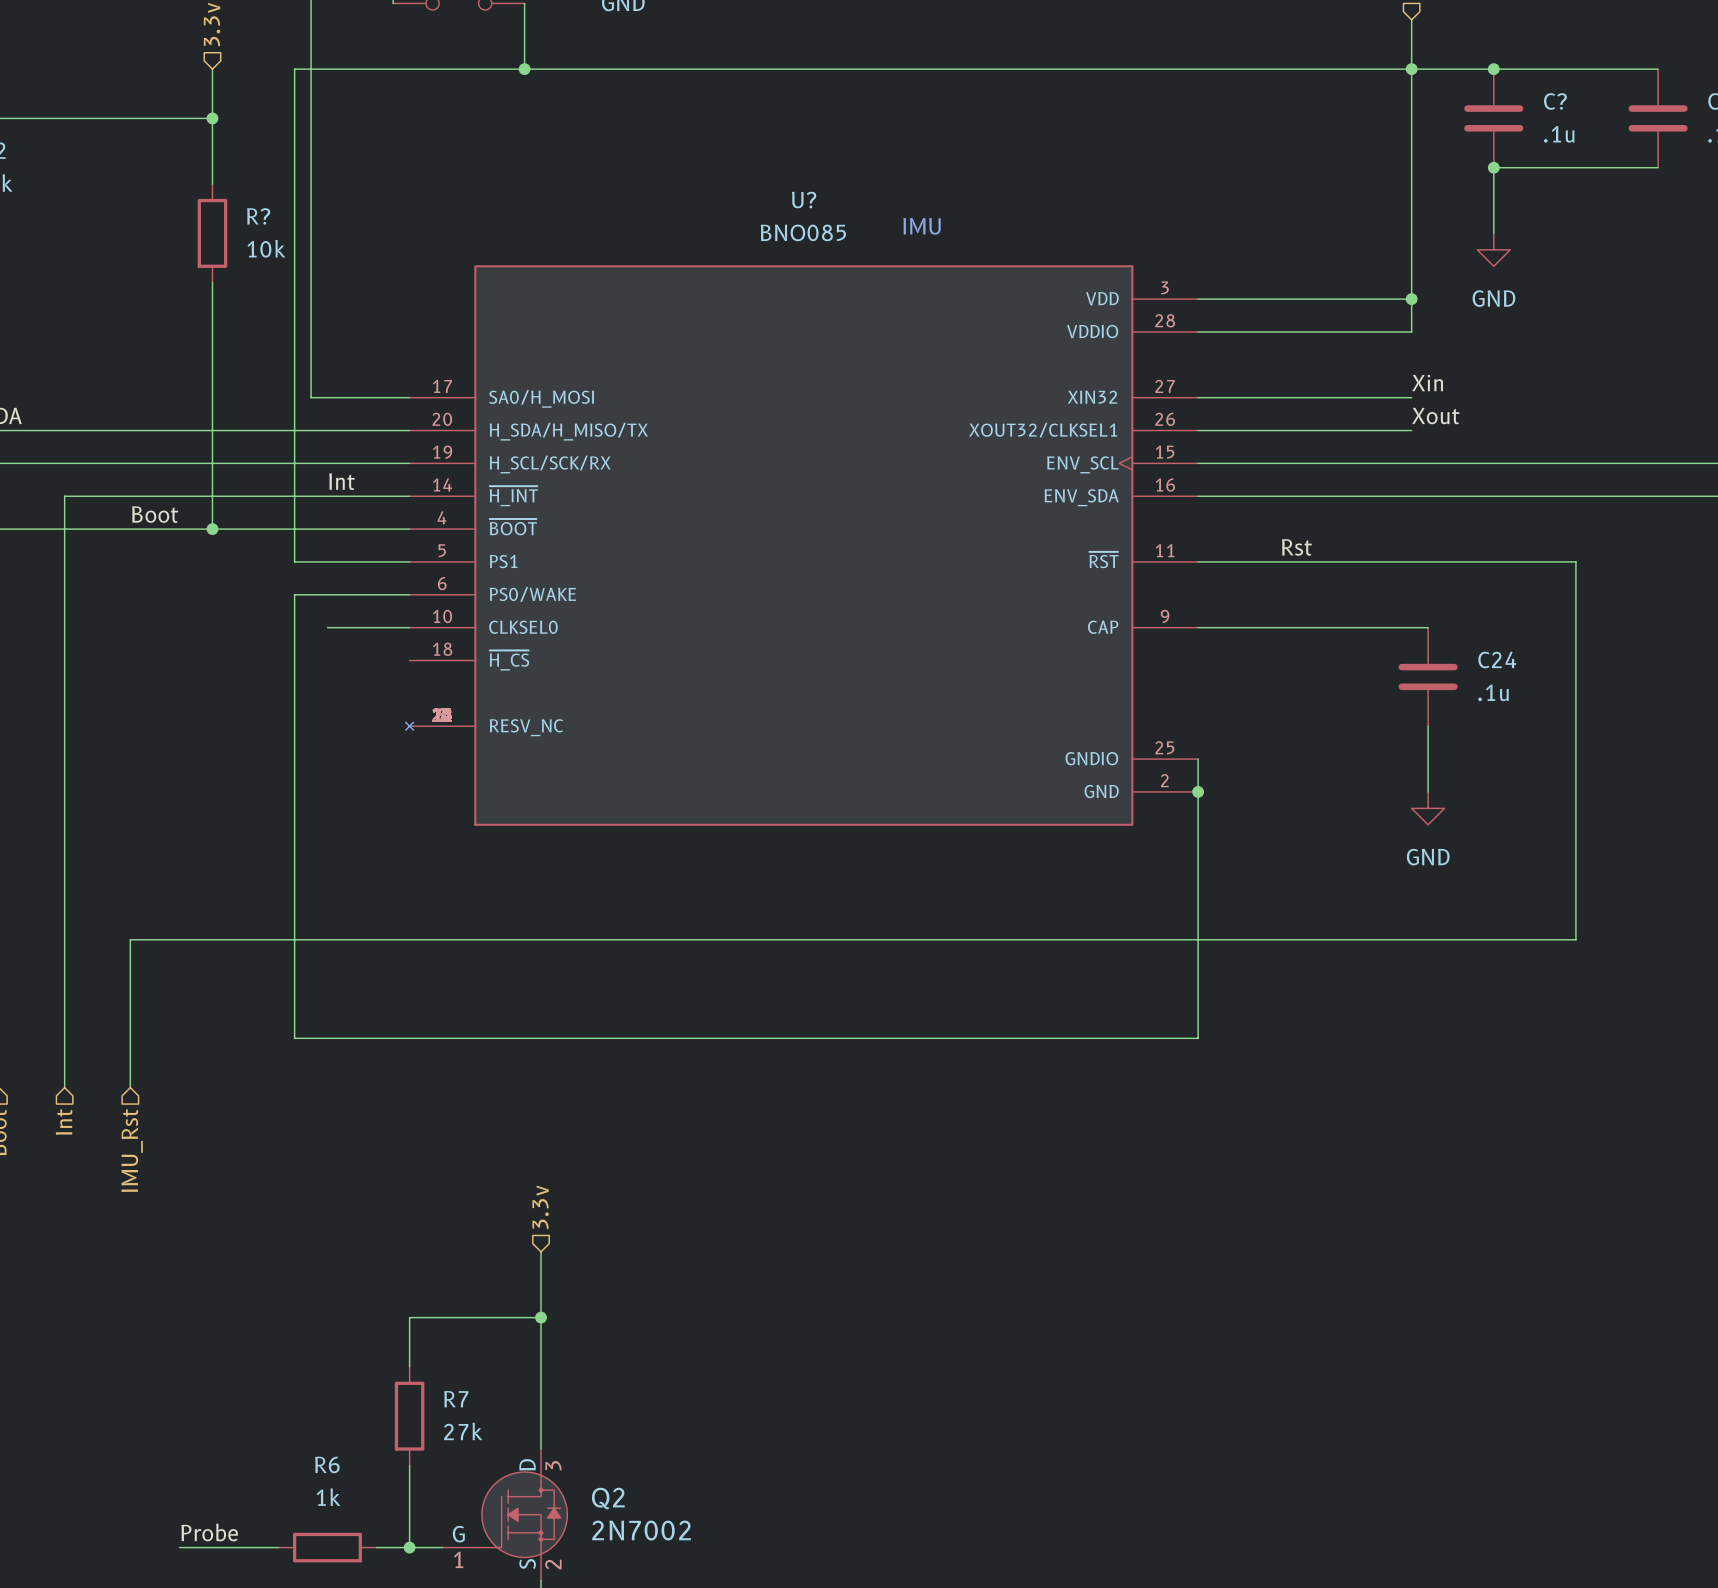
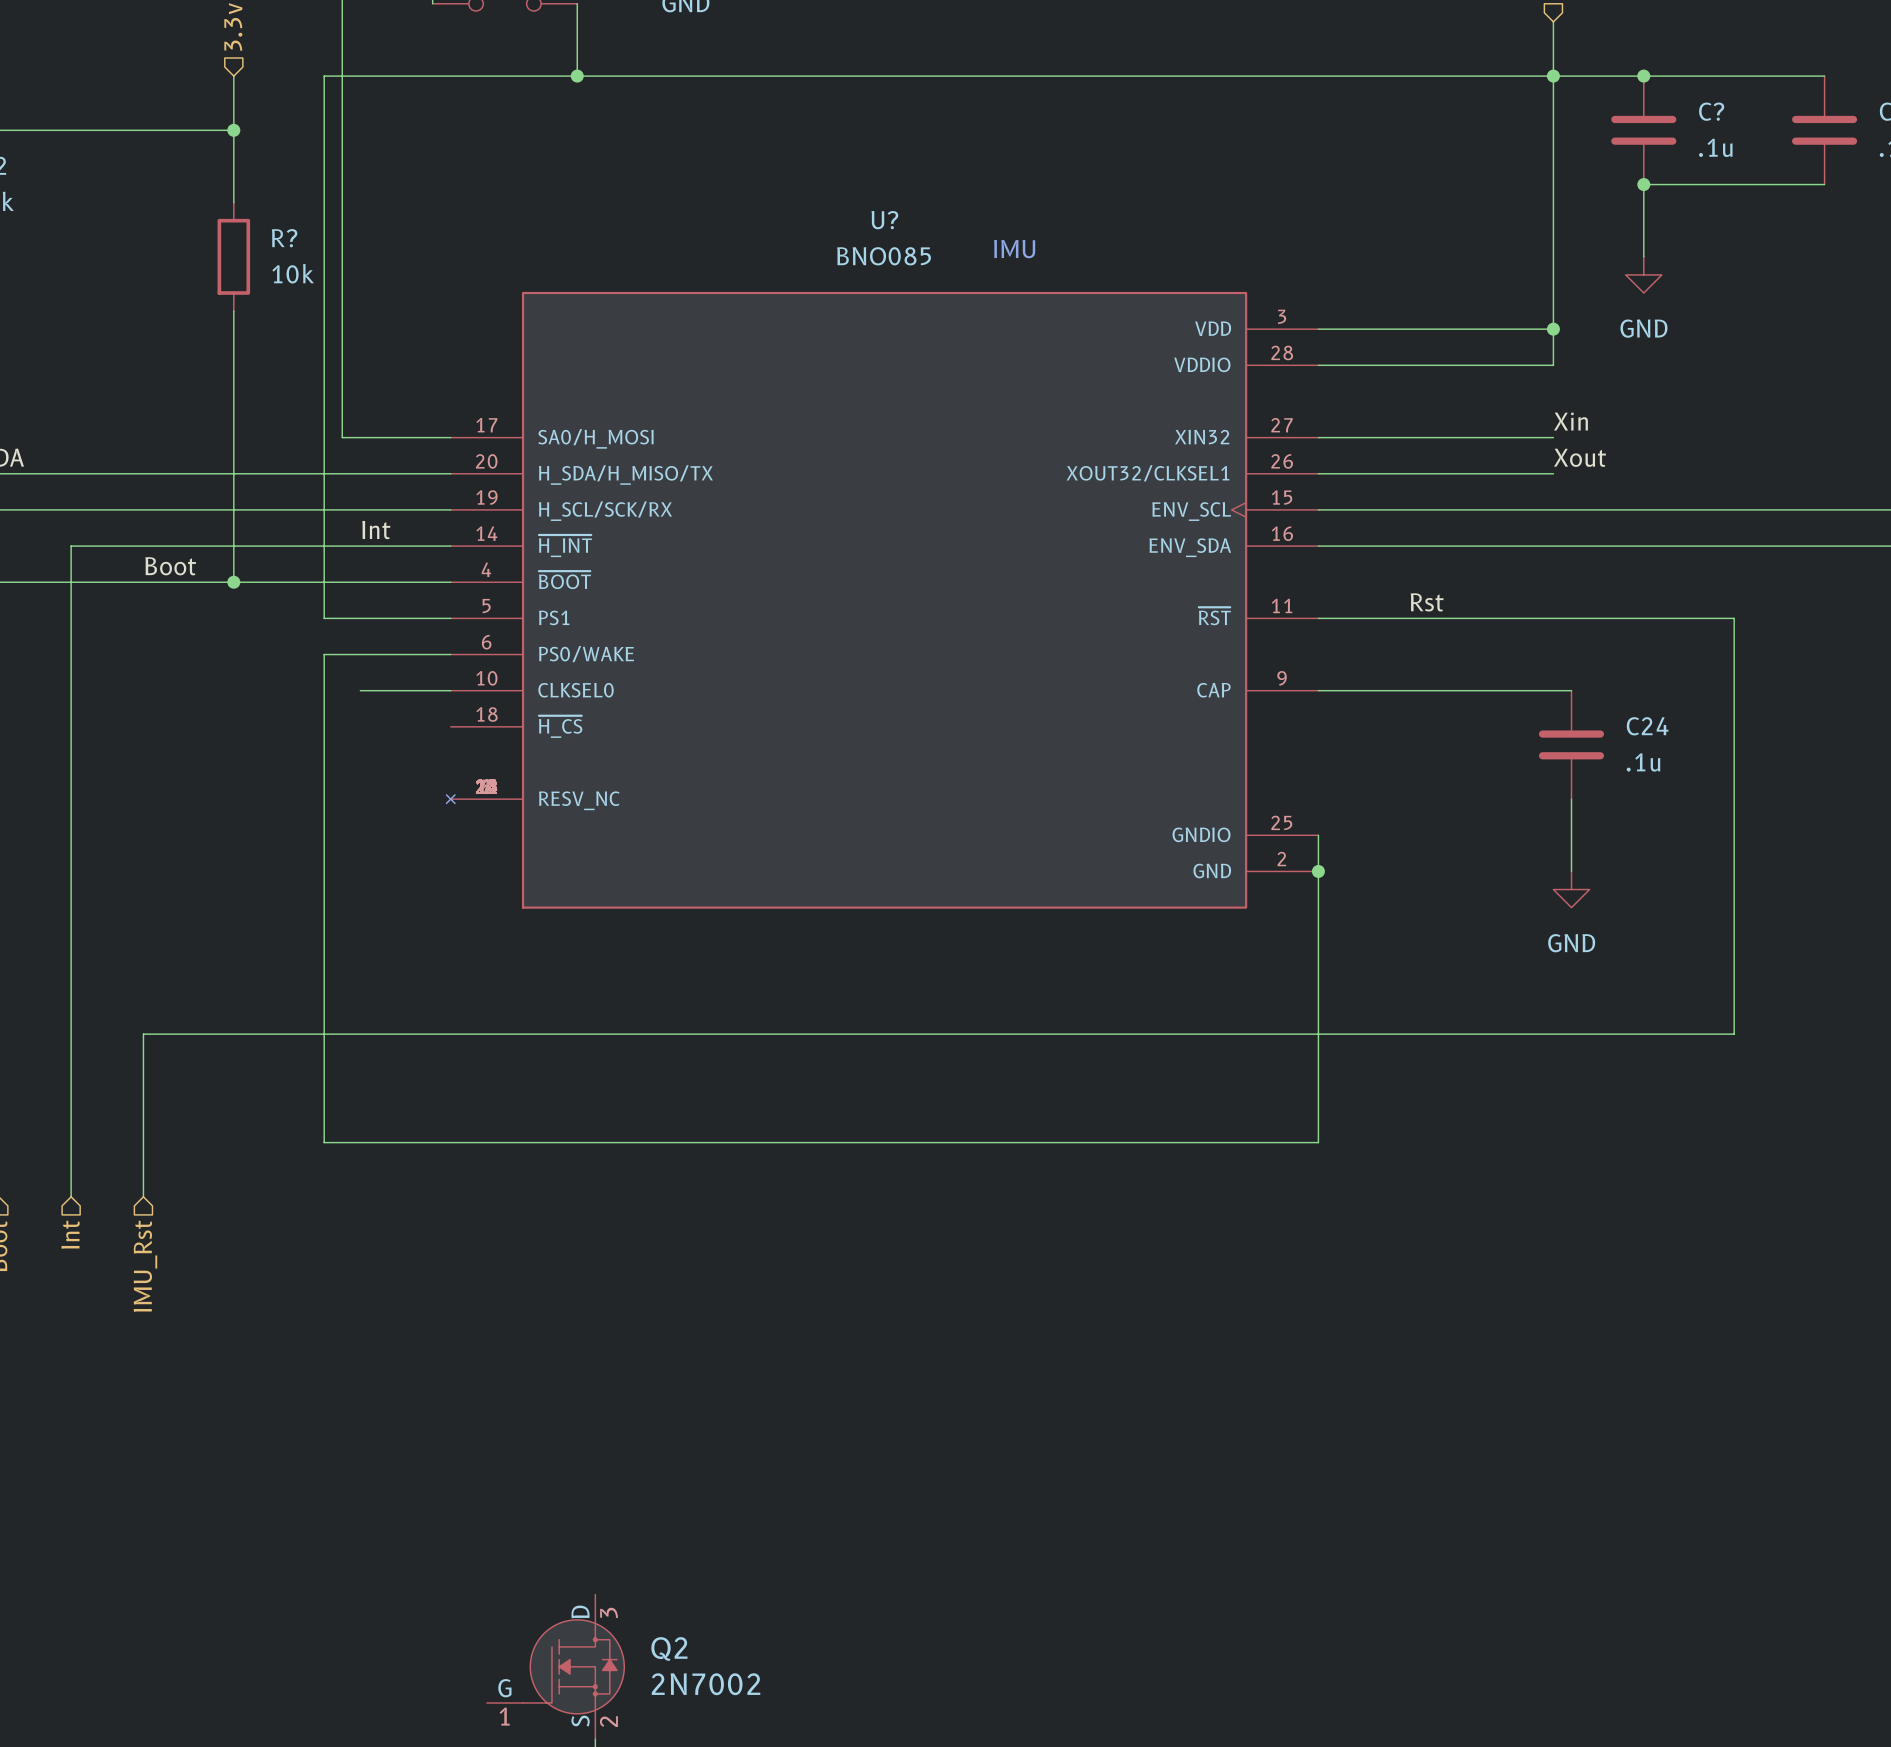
hierarchical label: 3.3v (540, 1207) -> none
wire: (541, 1251) (541, 1449) -> none
wire: (541, 1317) (409, 1317) (409, 1366) -> none
junction: (541, 1317) -> none
R7: 27k (409, 1416) -> none
wire: (409, 1465) (409, 1547) -> none
label: Probe (209, 1532) -> none
wire: (179, 1547) (278, 1547) -> none
R6: 1k (327, 1547) -> none
wire: (376, 1547) (442, 1547) -> none
junction: (409, 1547) -> none

